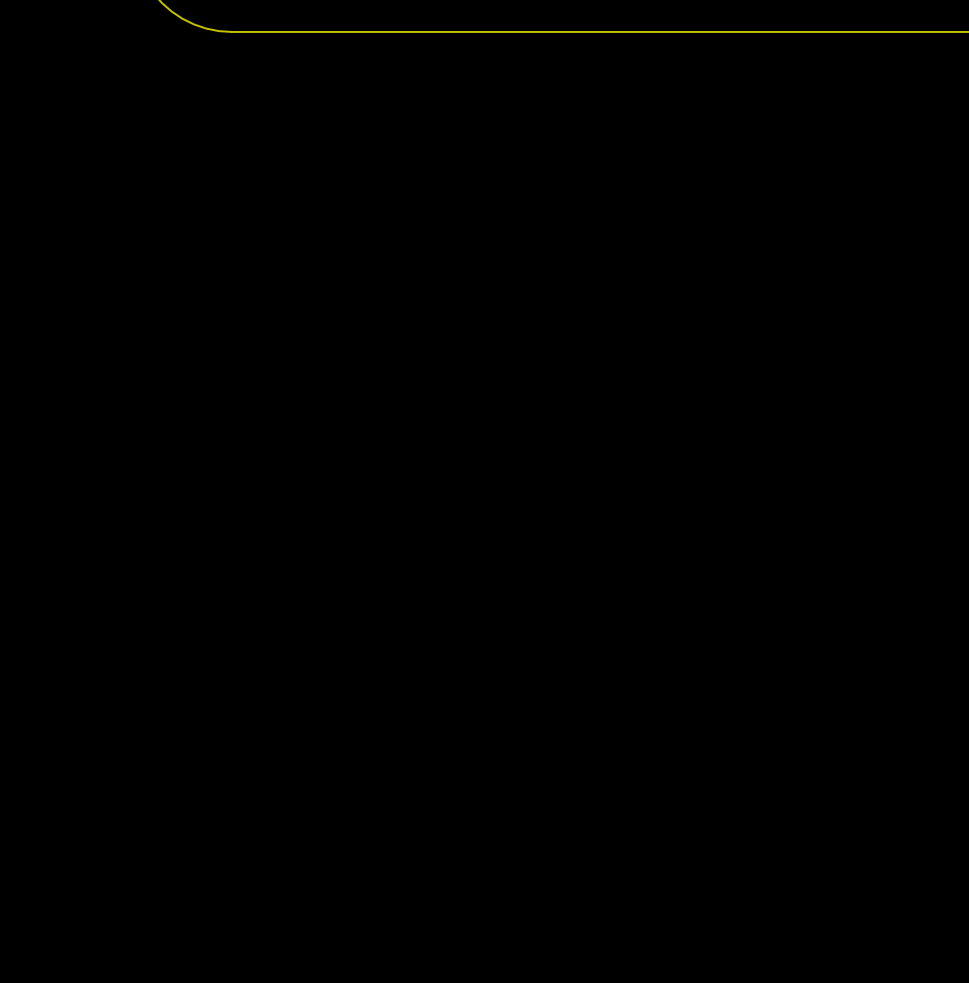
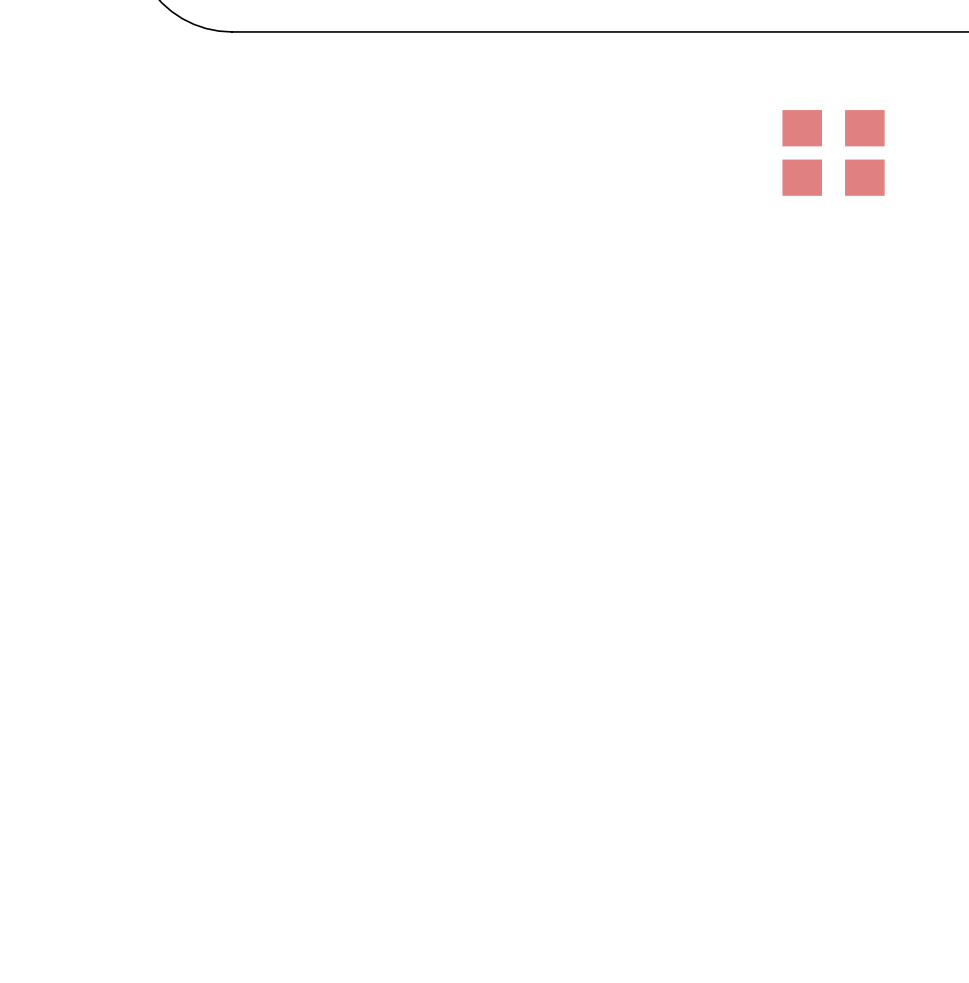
part: none -> (833, 152)

